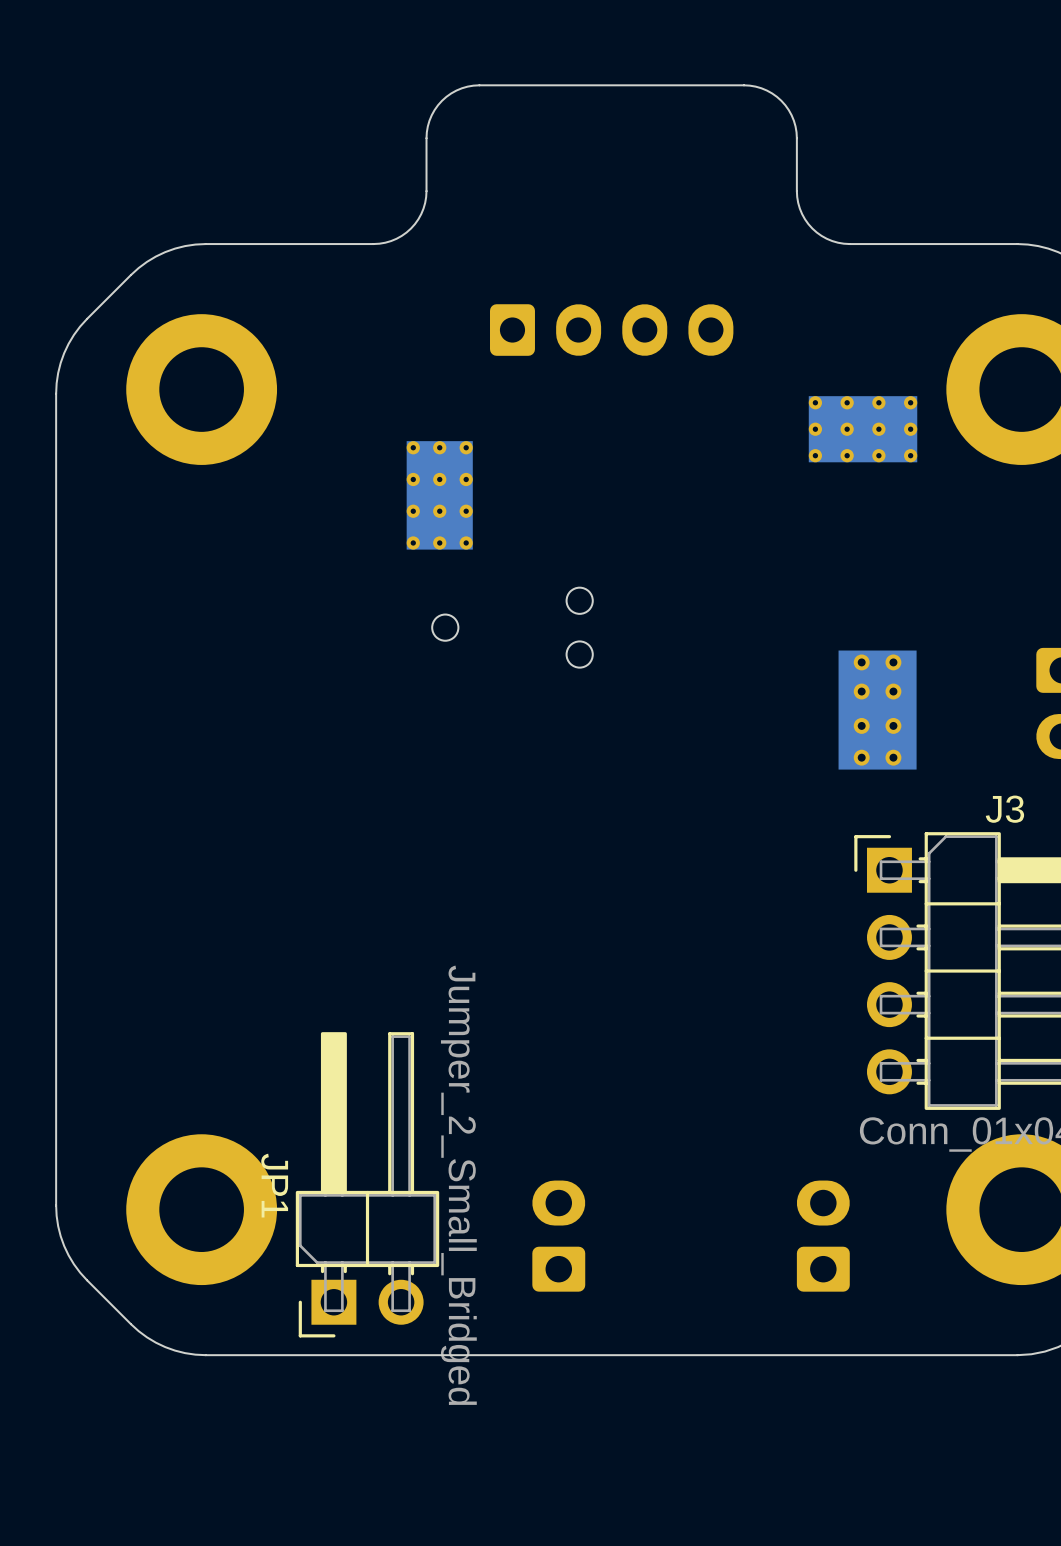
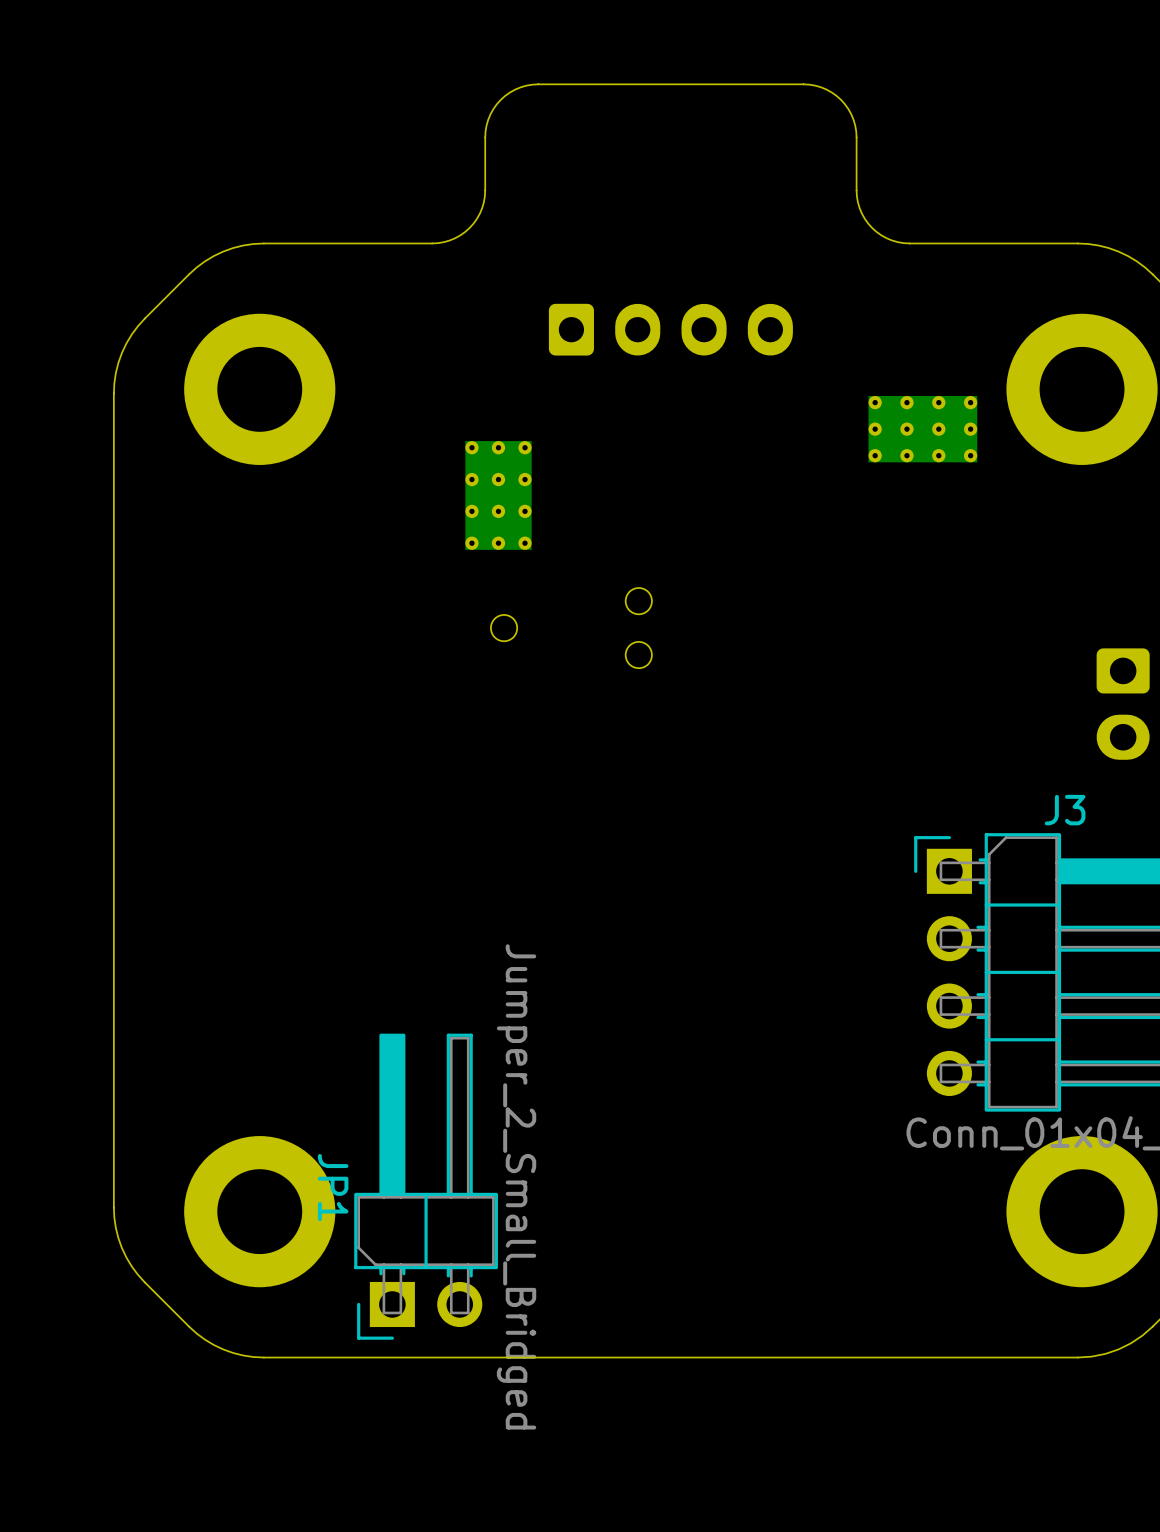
part: (877, 710) -> none
part: (558, 1236) -> none
part: (823, 1236) -> none

